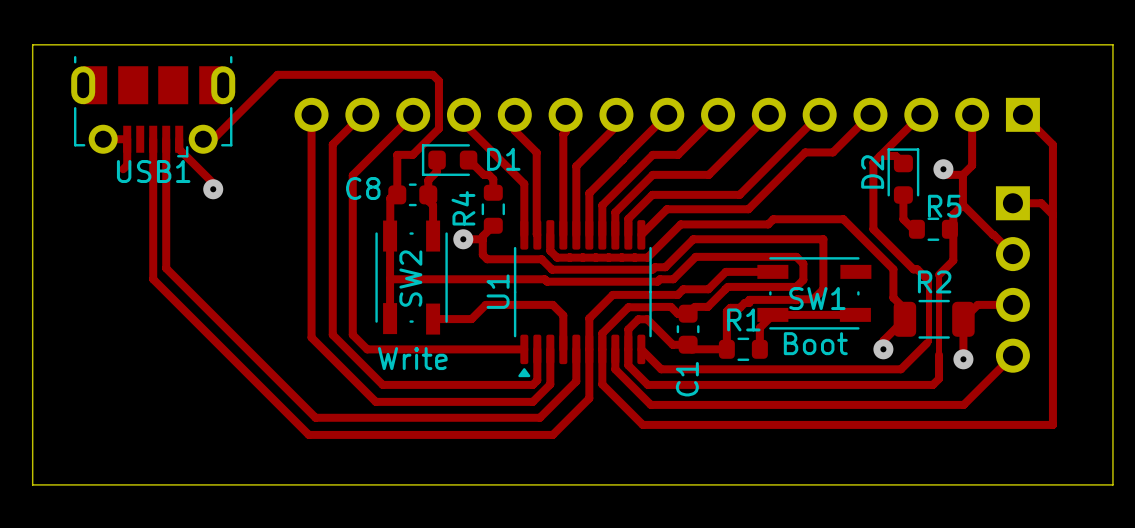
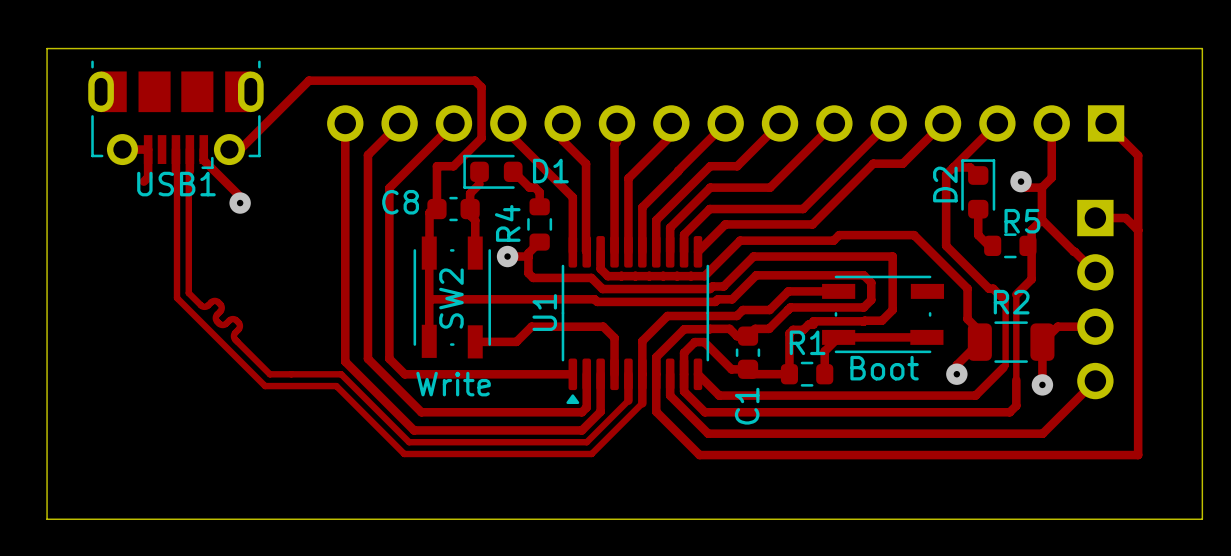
track: (153, 159) (153, 279) (308, 434) (552, 434) (589, 398) (589, 376) -> (175, 171) (177, 298) (265, 386) (336, 386) (404, 453) (591, 453) (642, 403)
track: (166, 159) (166, 268) (315, 417) (539, 417) (576, 381) (576, 373) -> (189, 171) (188, 293) (203, 306) (213, 301) (218, 302) (221, 308) (215, 318) (220, 324) (224, 324) (231, 319) (236, 320) (239, 326) (234, 334) (234, 338) (269, 374) (341, 374) (409, 442) (586, 442) (628, 400)
SW1 name: SW1 (817, 298) -> none

